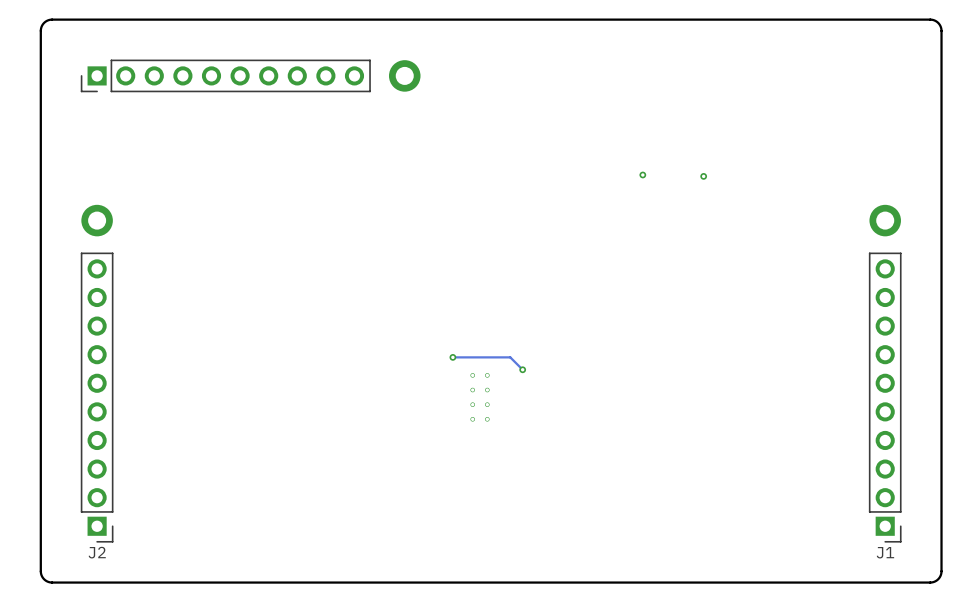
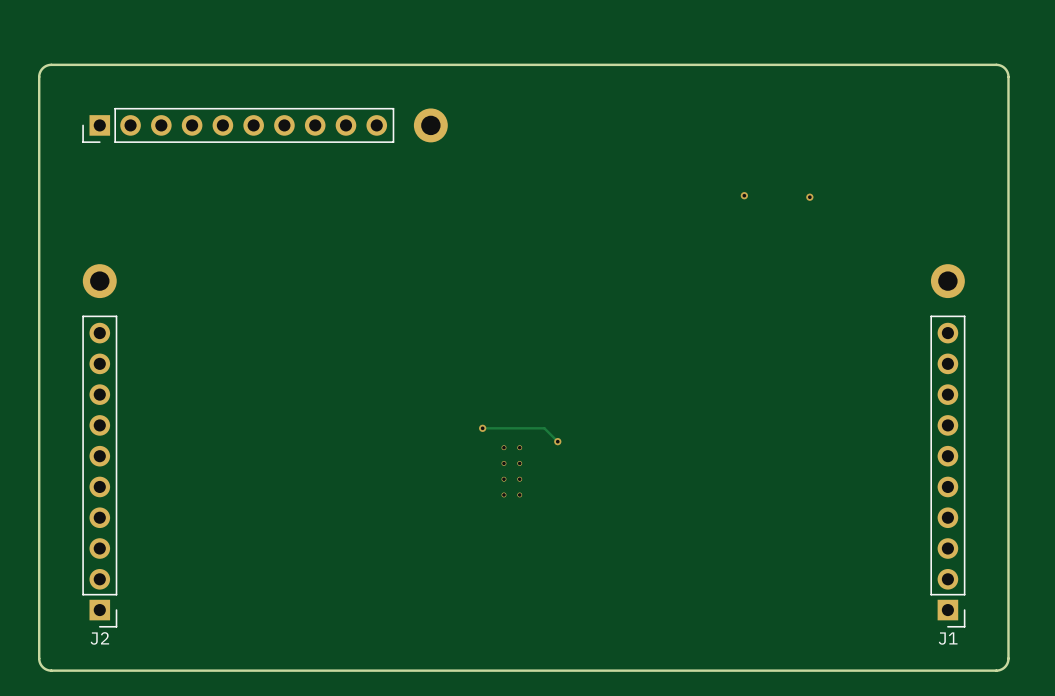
via: none -> (744, 195)
via: none -> (809, 197)
via: (642, 174) -> none
via: (703, 176) -> none

